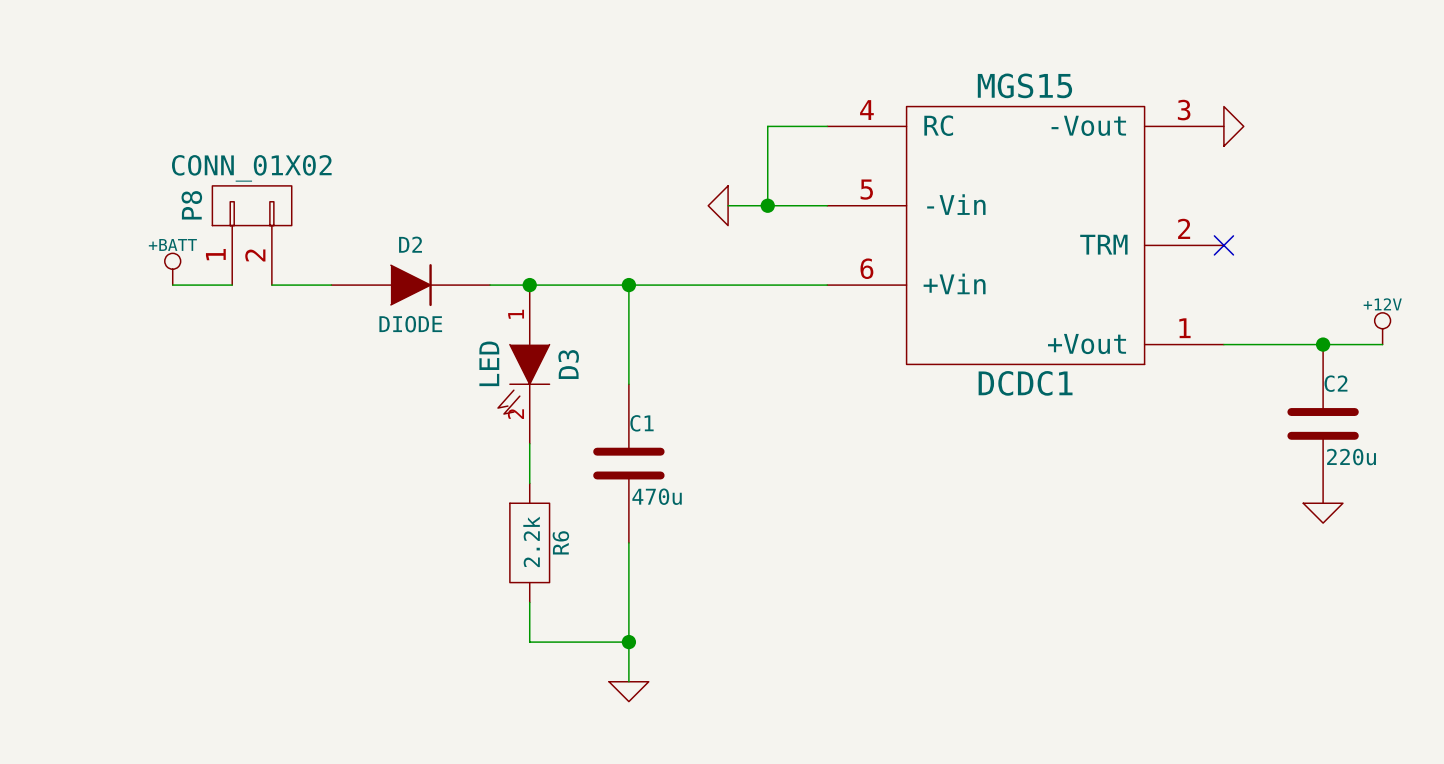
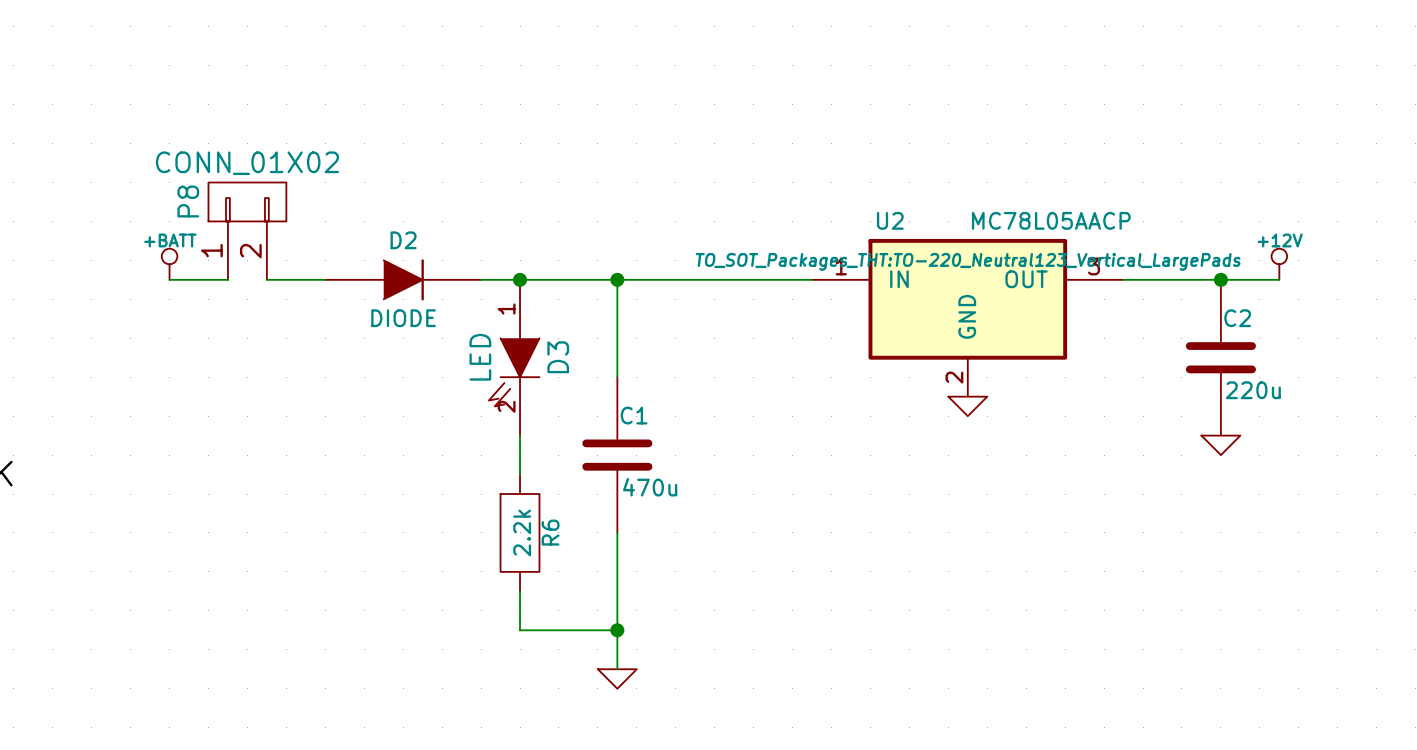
wire: (827, 126) (767, 126) (767, 205) -> none
power symbol: (1233, 126) -> none
power symbol: (718, 205) -> none
wire: (728, 205) (827, 205) -> none
junction: (767, 205) -> none
DCDC1: MGS15 (1025, 235) -> none
no-connect mark: (1223, 245) -> none
junction: none -> (1220, 279)
U2: none -> MC78L05AACP (967, 317)
power symbol position: +12V (1382, 328) -> +12V (1279, 264)
wire: (1223, 344) (1382, 344) -> (1123, 279) (1279, 279)
junction: (1323, 344) -> none
power symbol: none -> (967, 406)
C2 position: (1323, 423) -> (1220, 357)
power symbol position: (1323, 513) -> (1220, 445)

